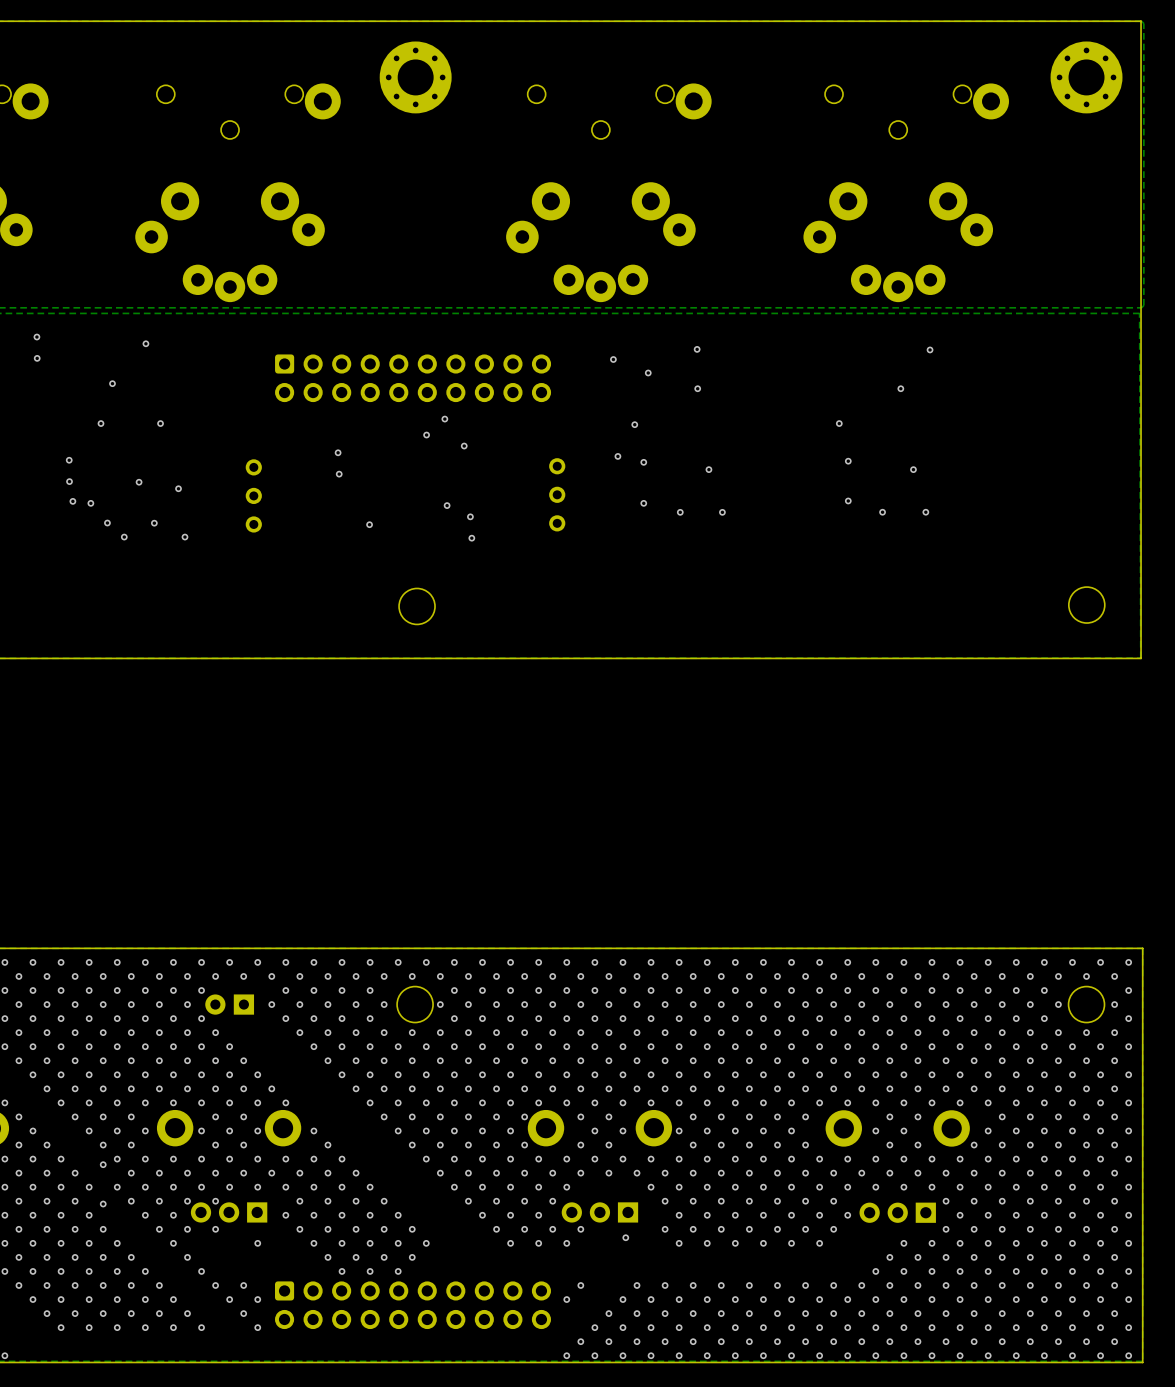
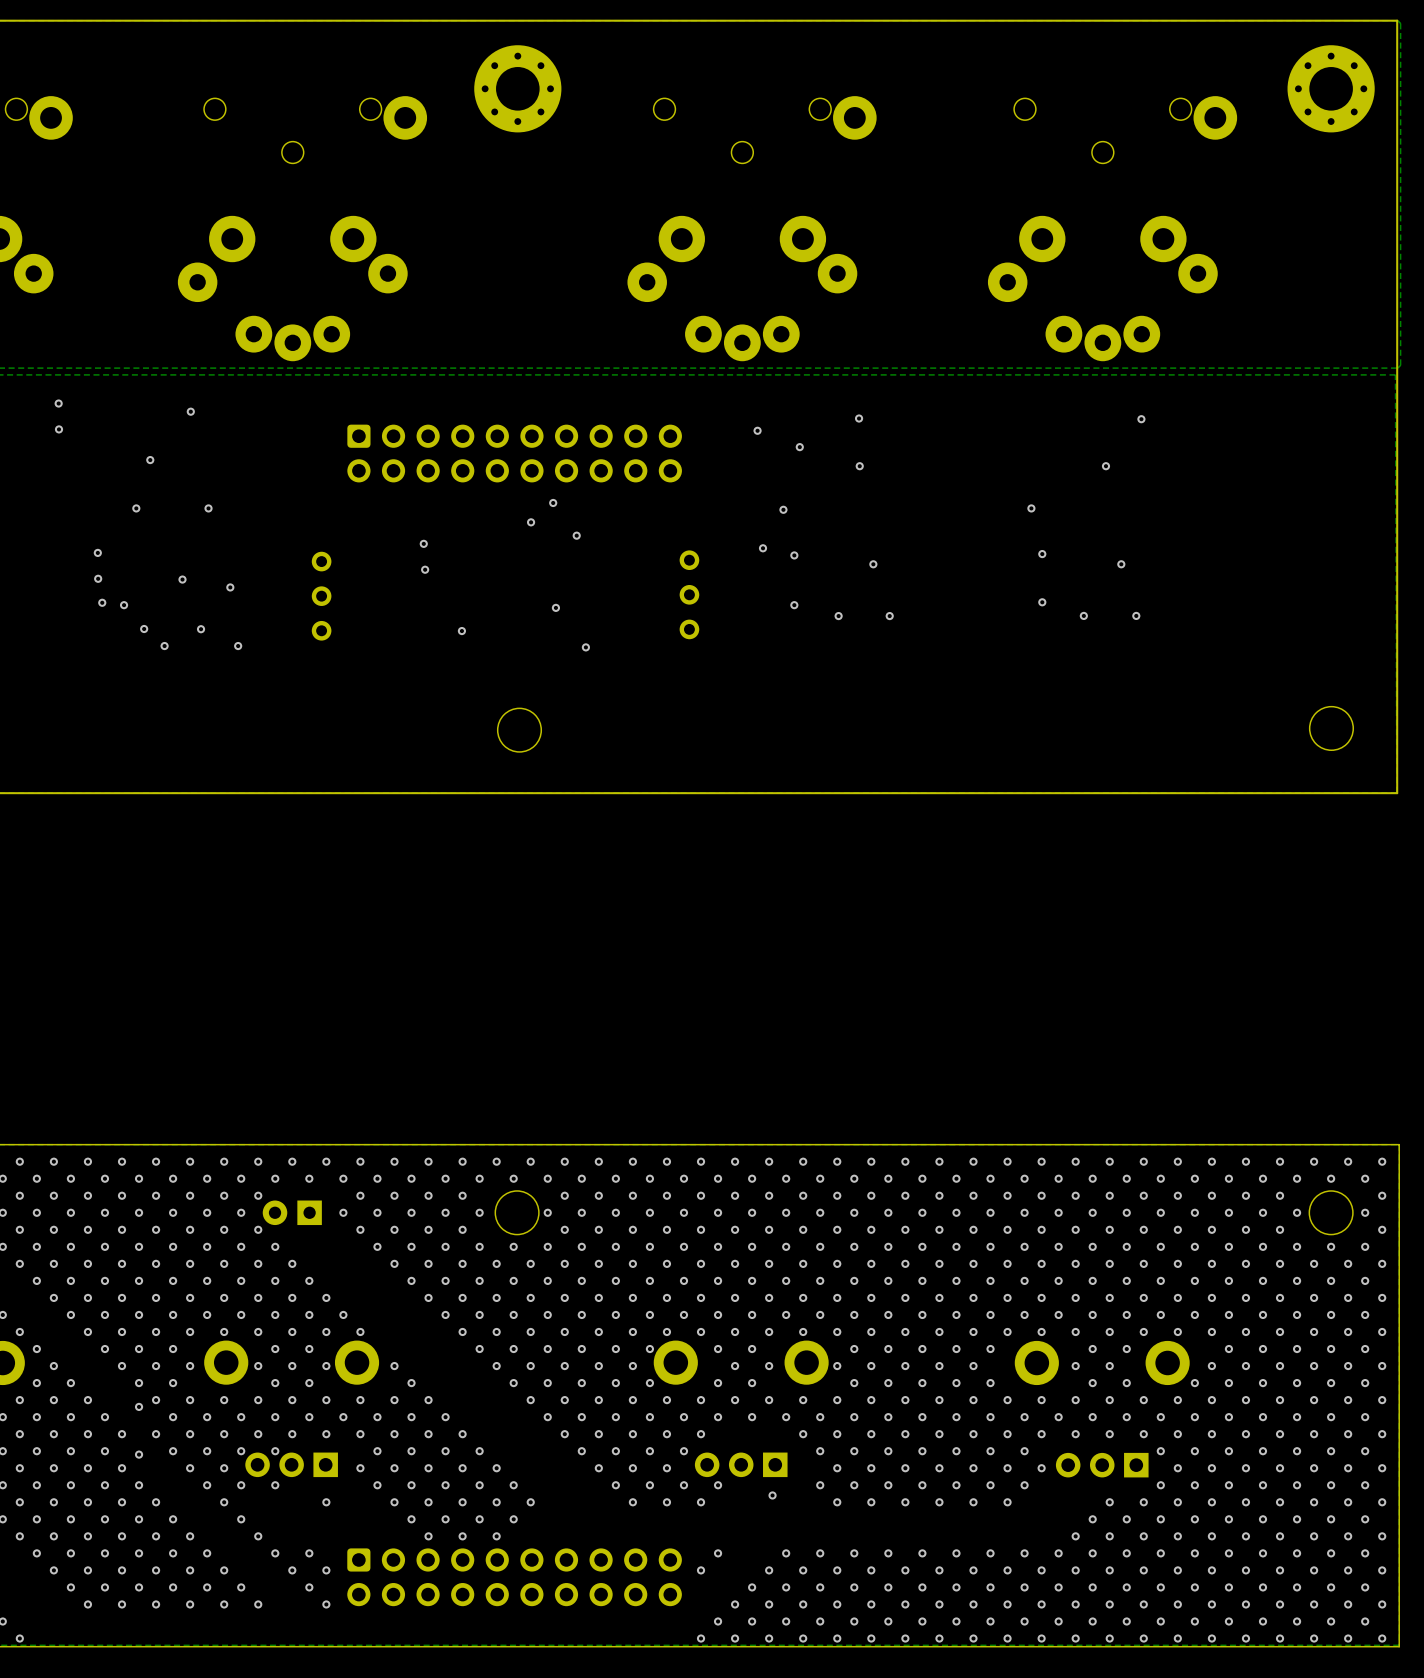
via: (470, 516) -> none

